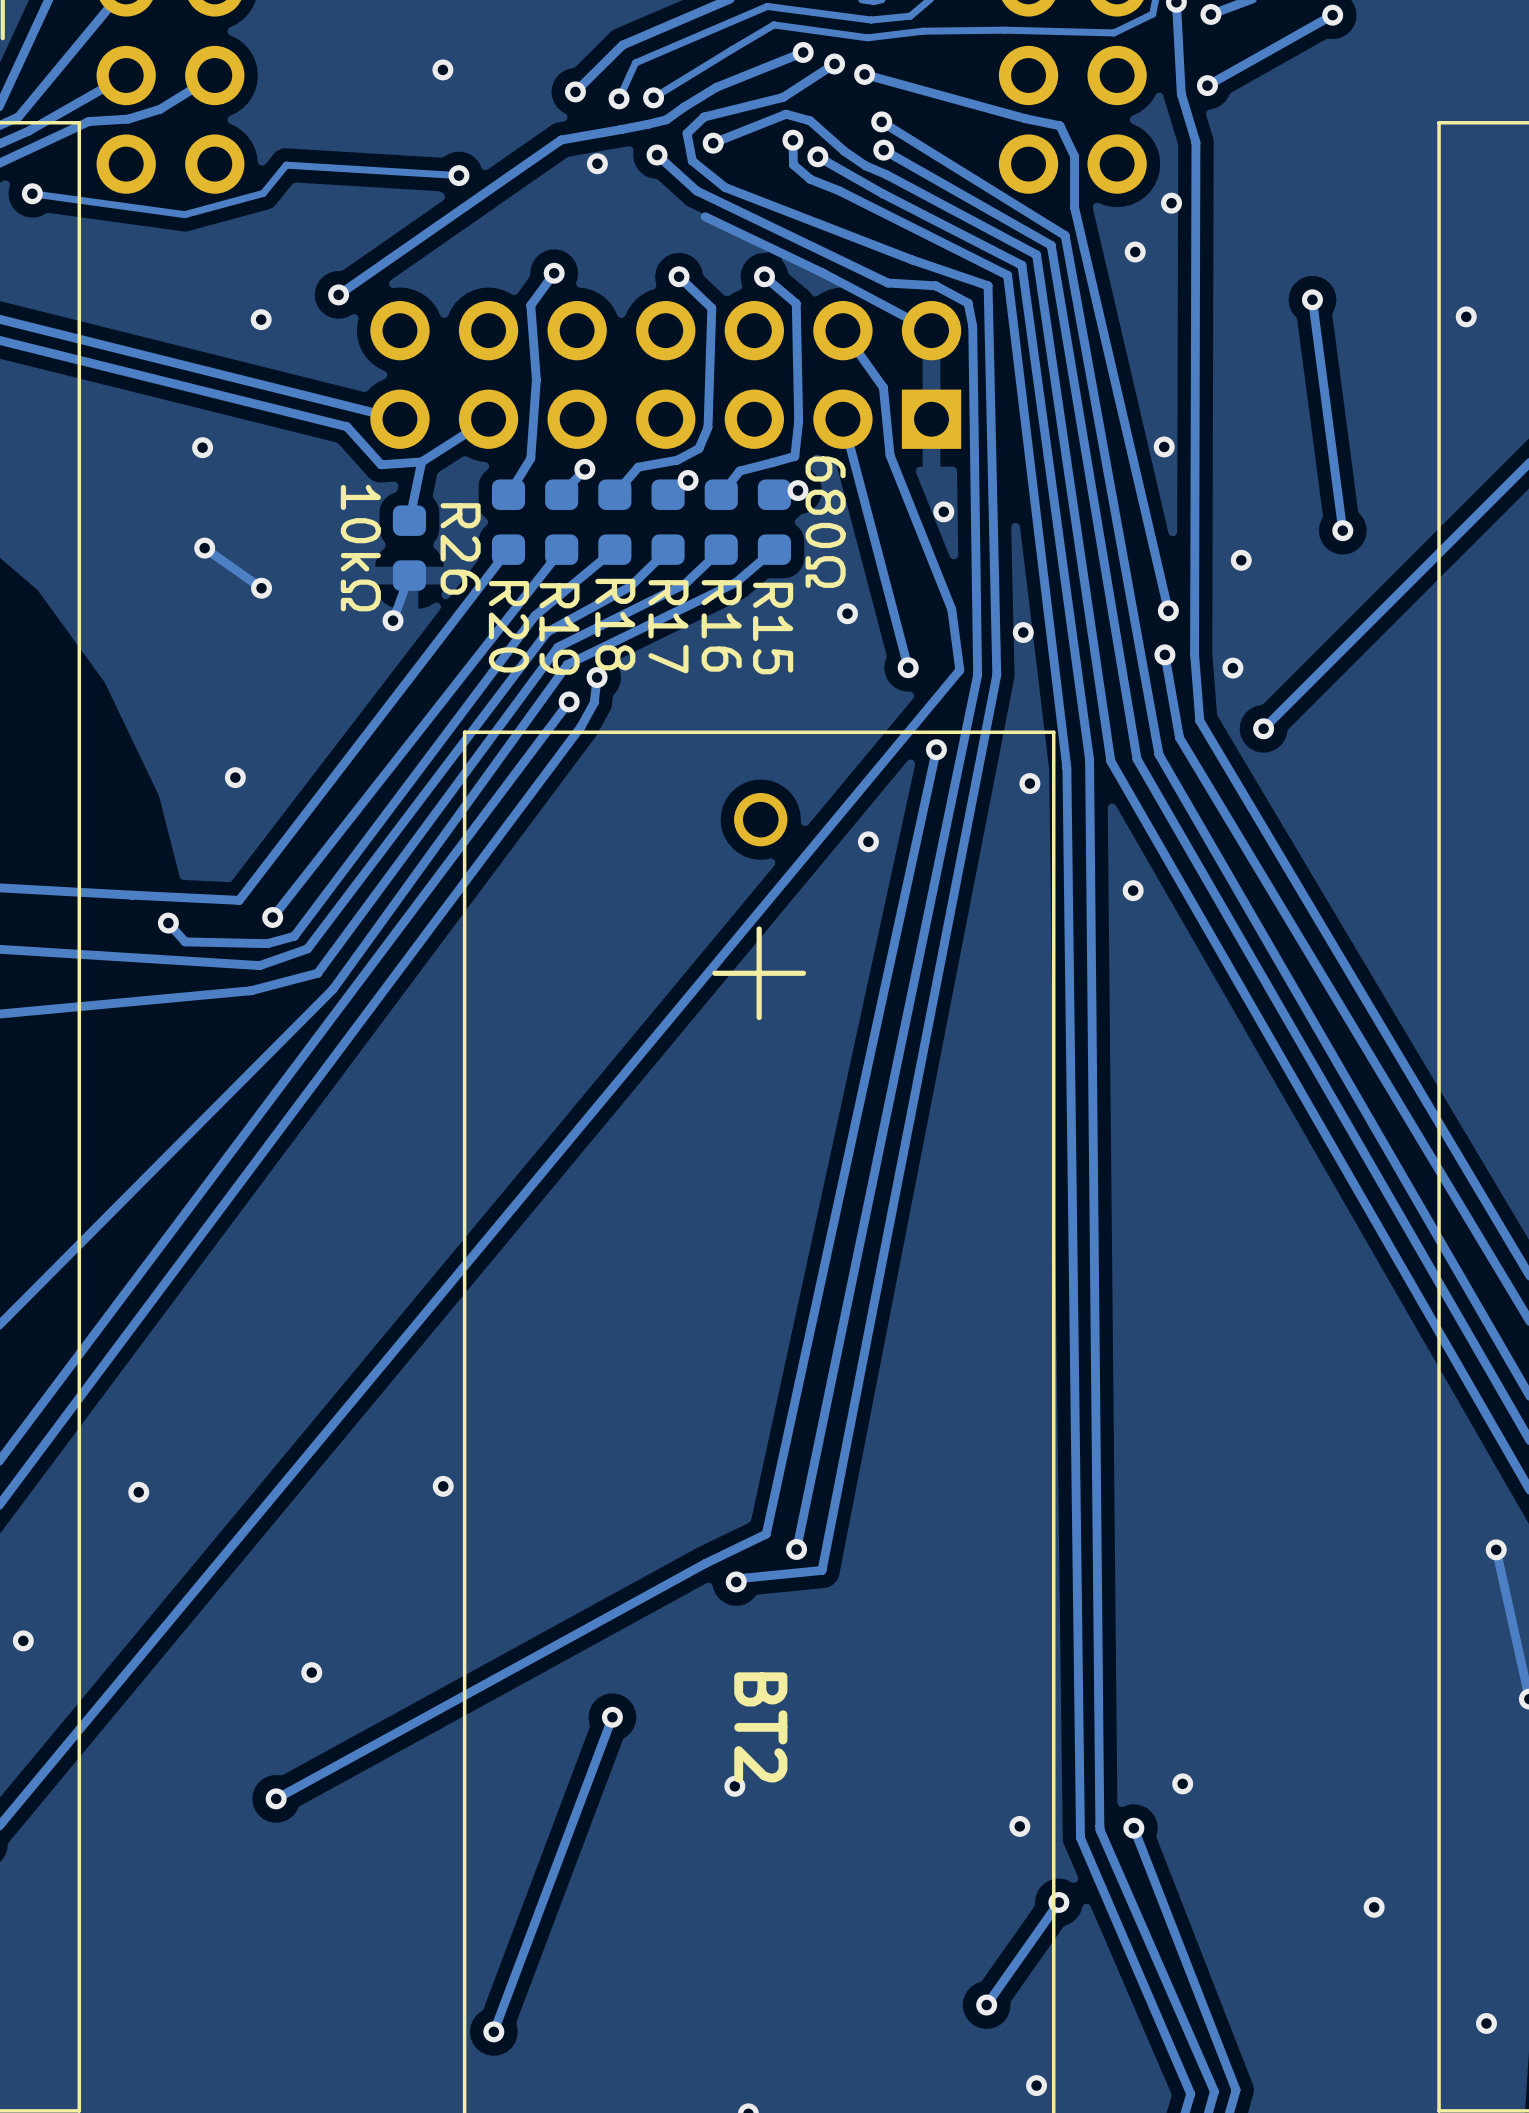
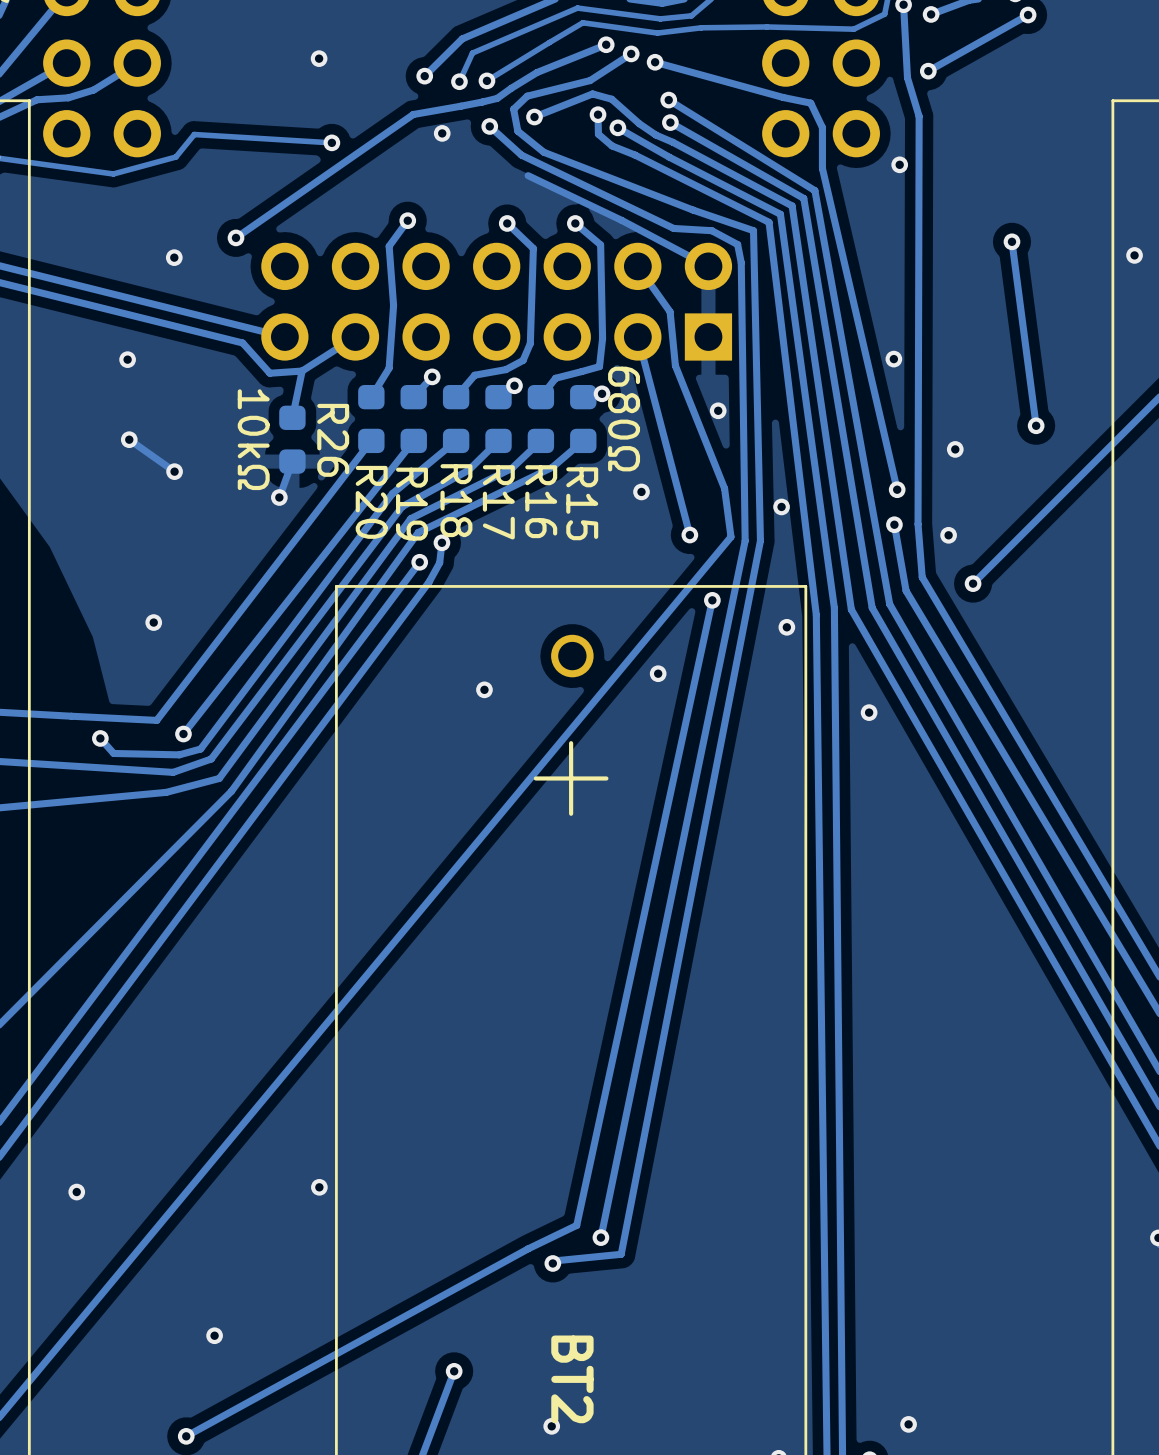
via: (1135, 251) -> none
via: none -> (484, 689)

